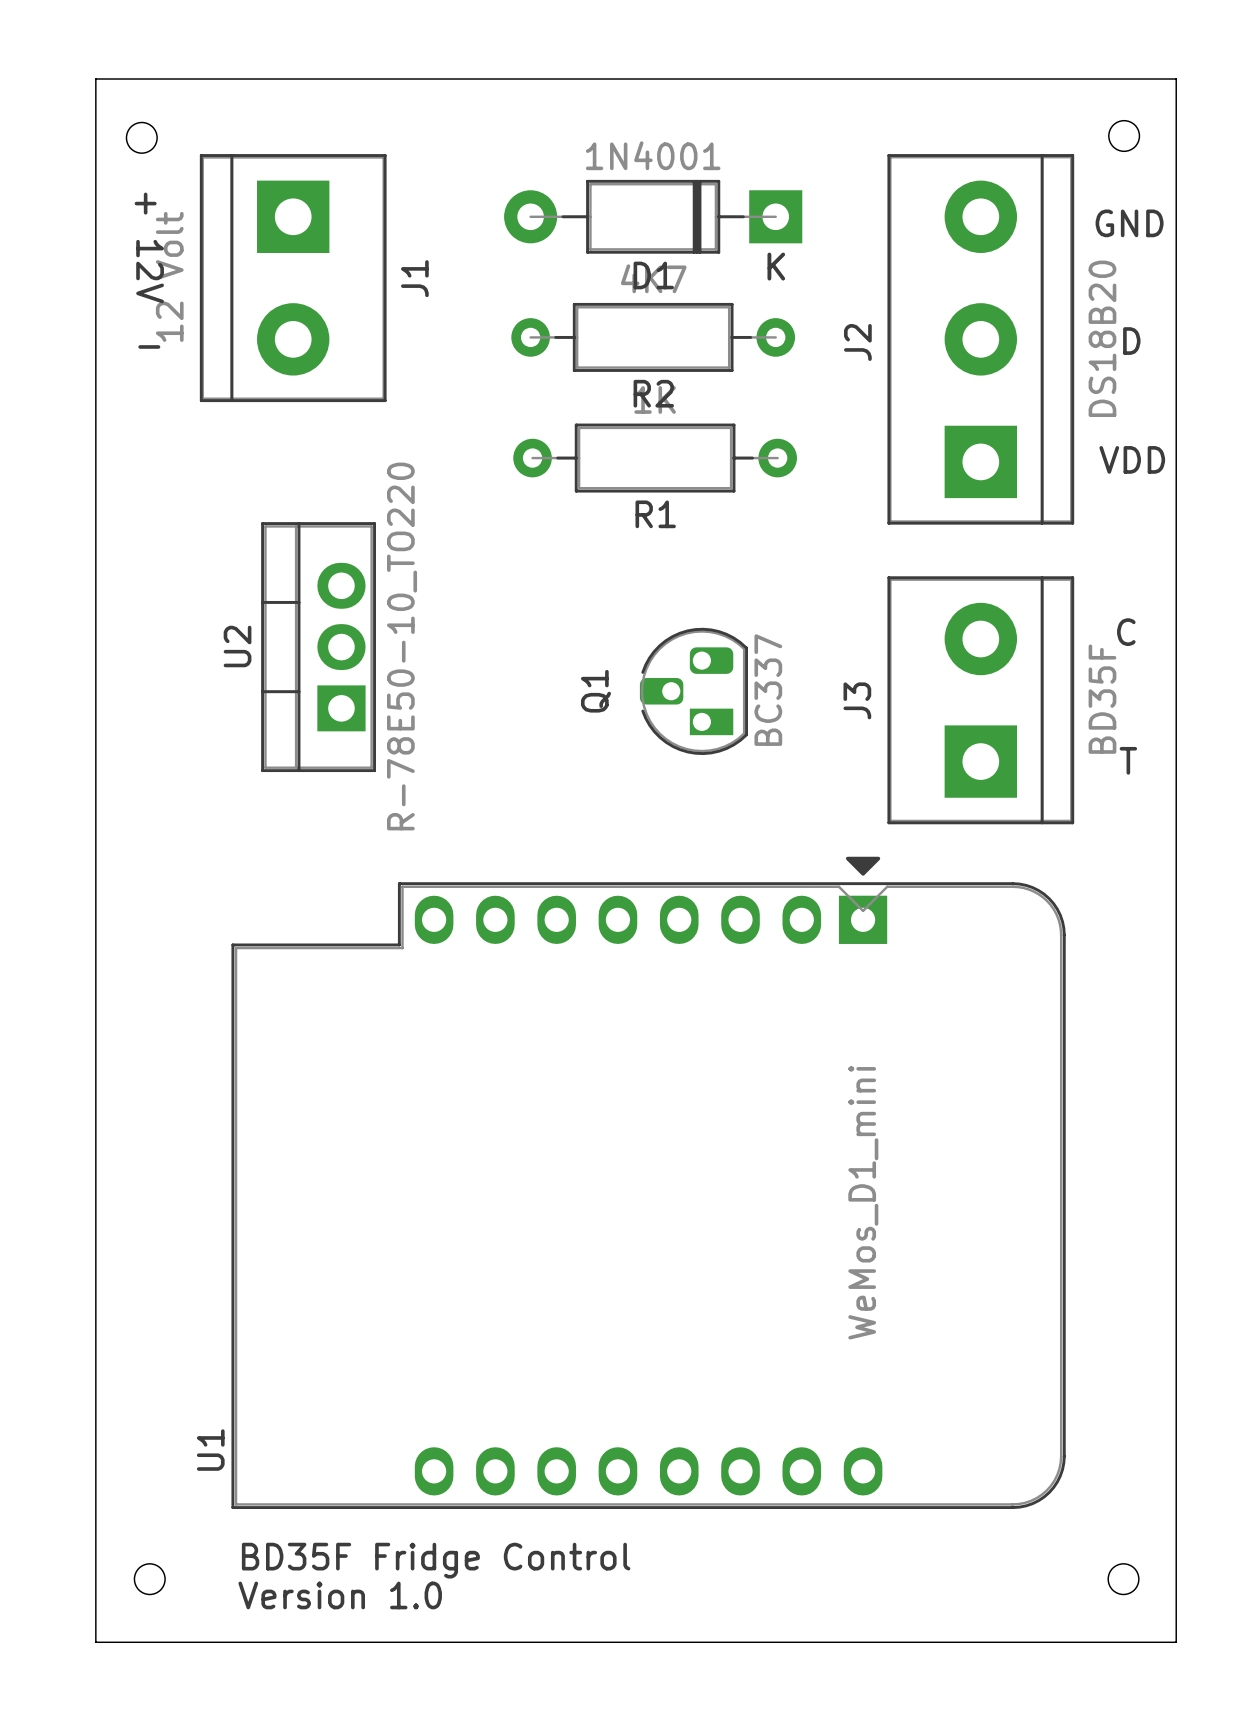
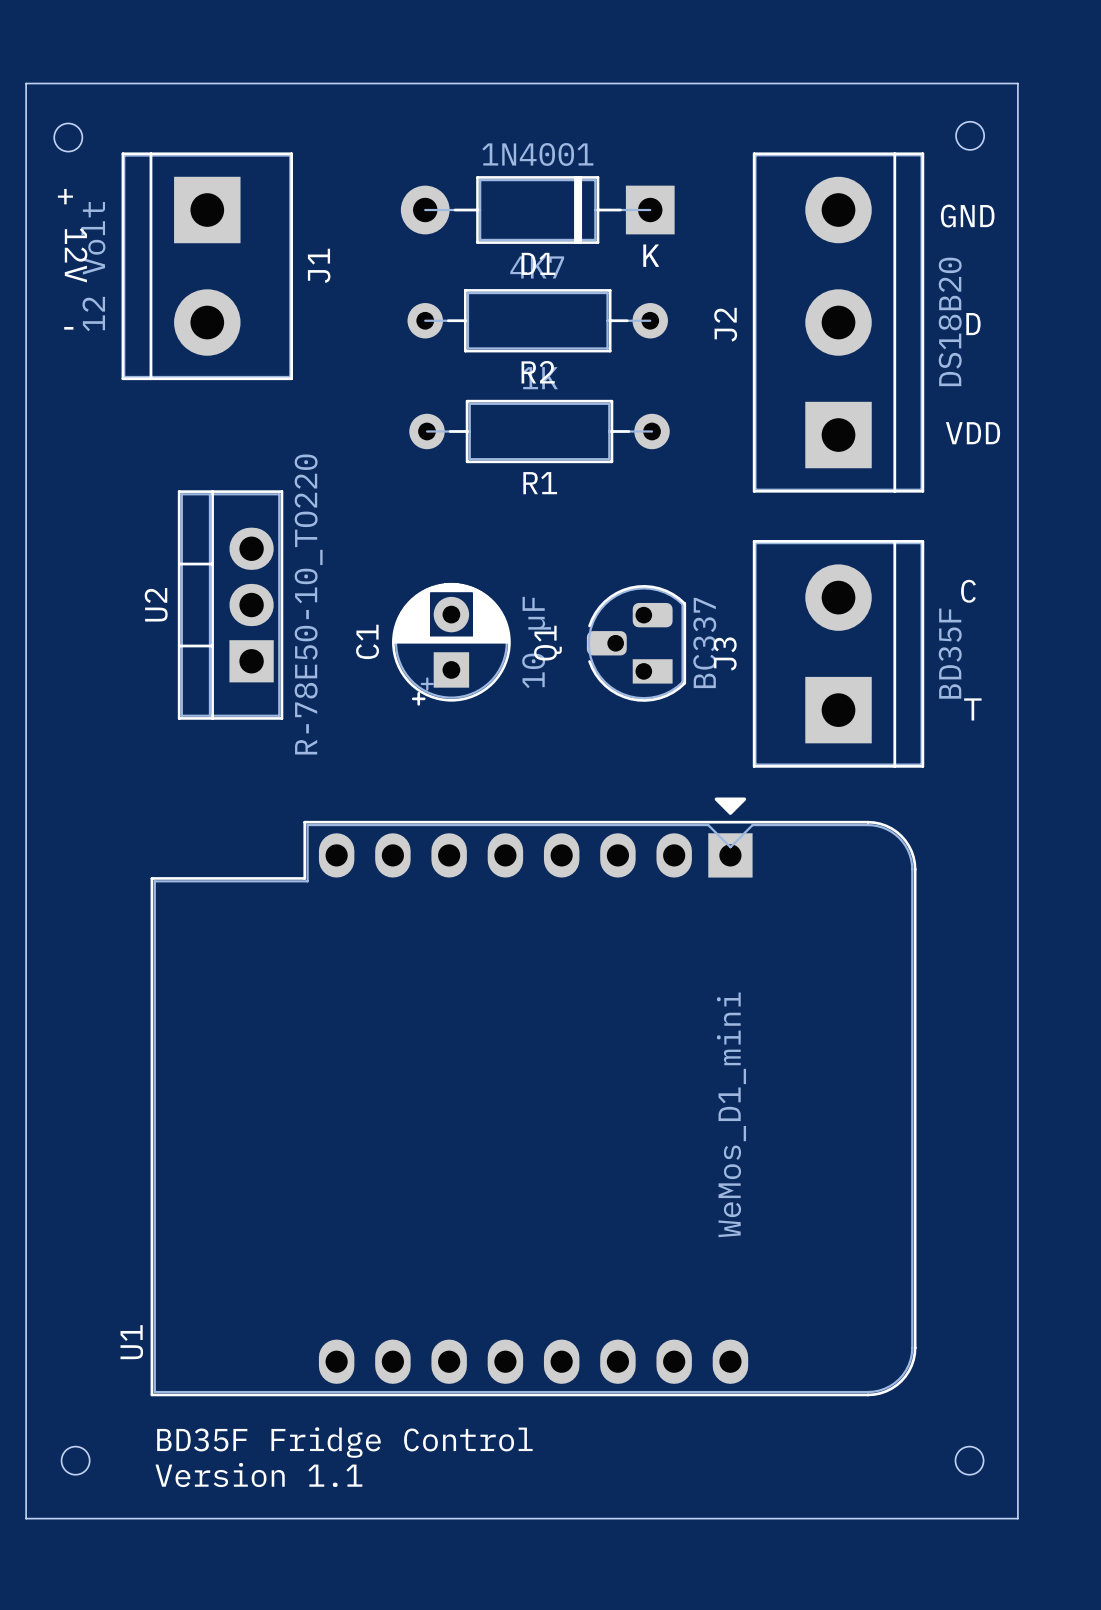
C1: none -> 10 µF (451, 644)
Q1 position: (693, 691) -> (636, 643)
text: Version 1.0 (340, 1595) -> Version 1.1 (258, 1475)

